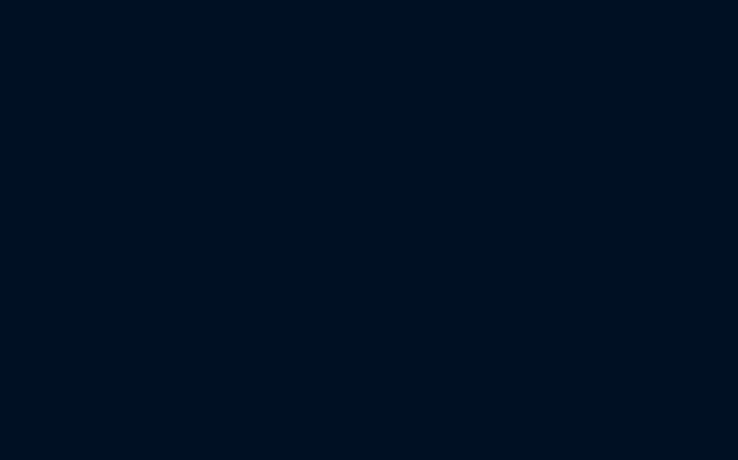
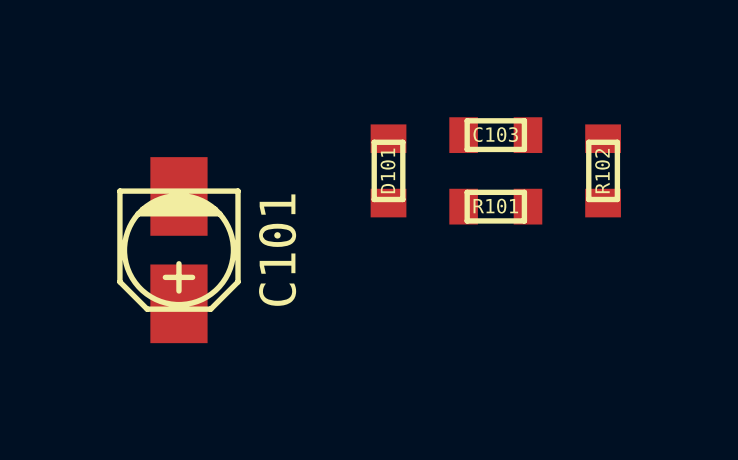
C103: none -> (495, 135)
D101: none -> (388, 170)
R102: none -> (603, 170)
R101: none -> (495, 206)
C101: none -> (178, 250)

